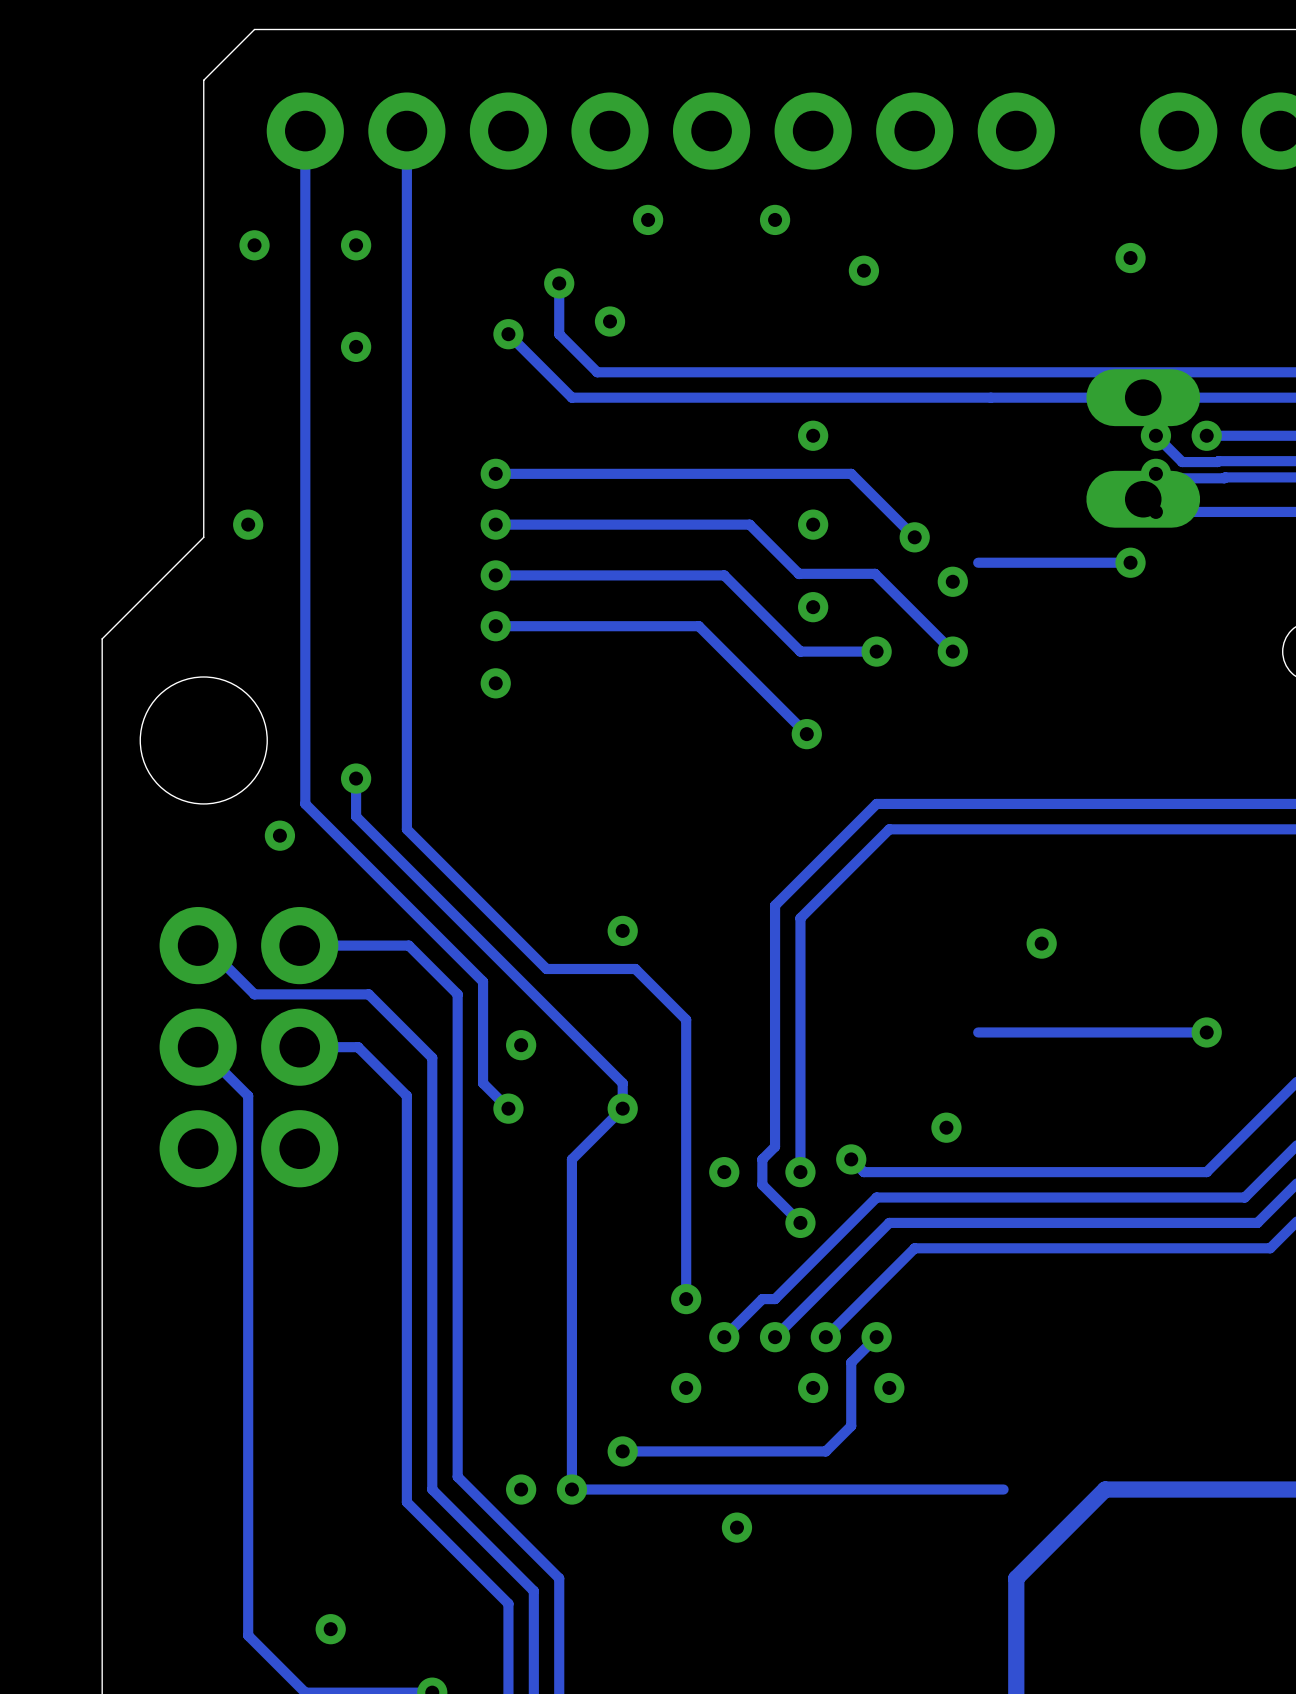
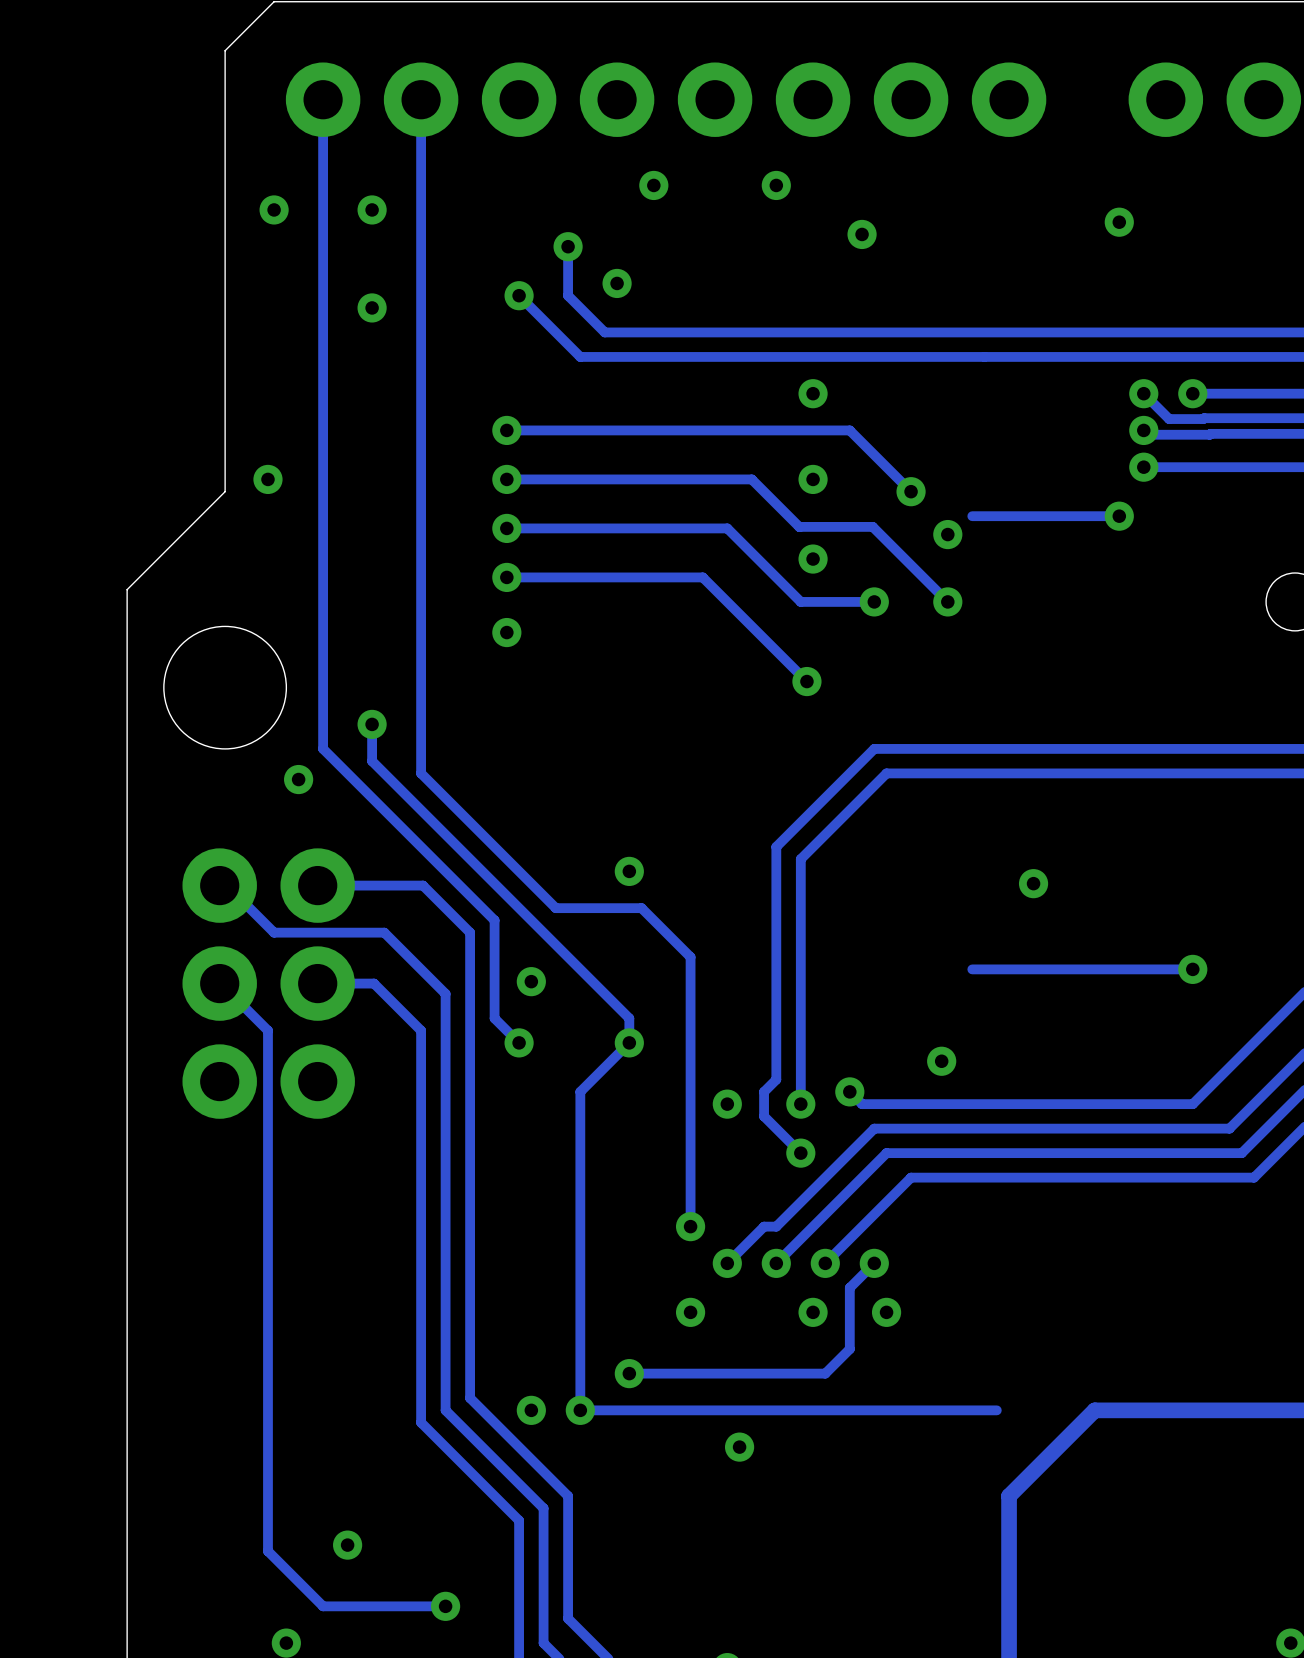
part: (1143, 448) -> none

